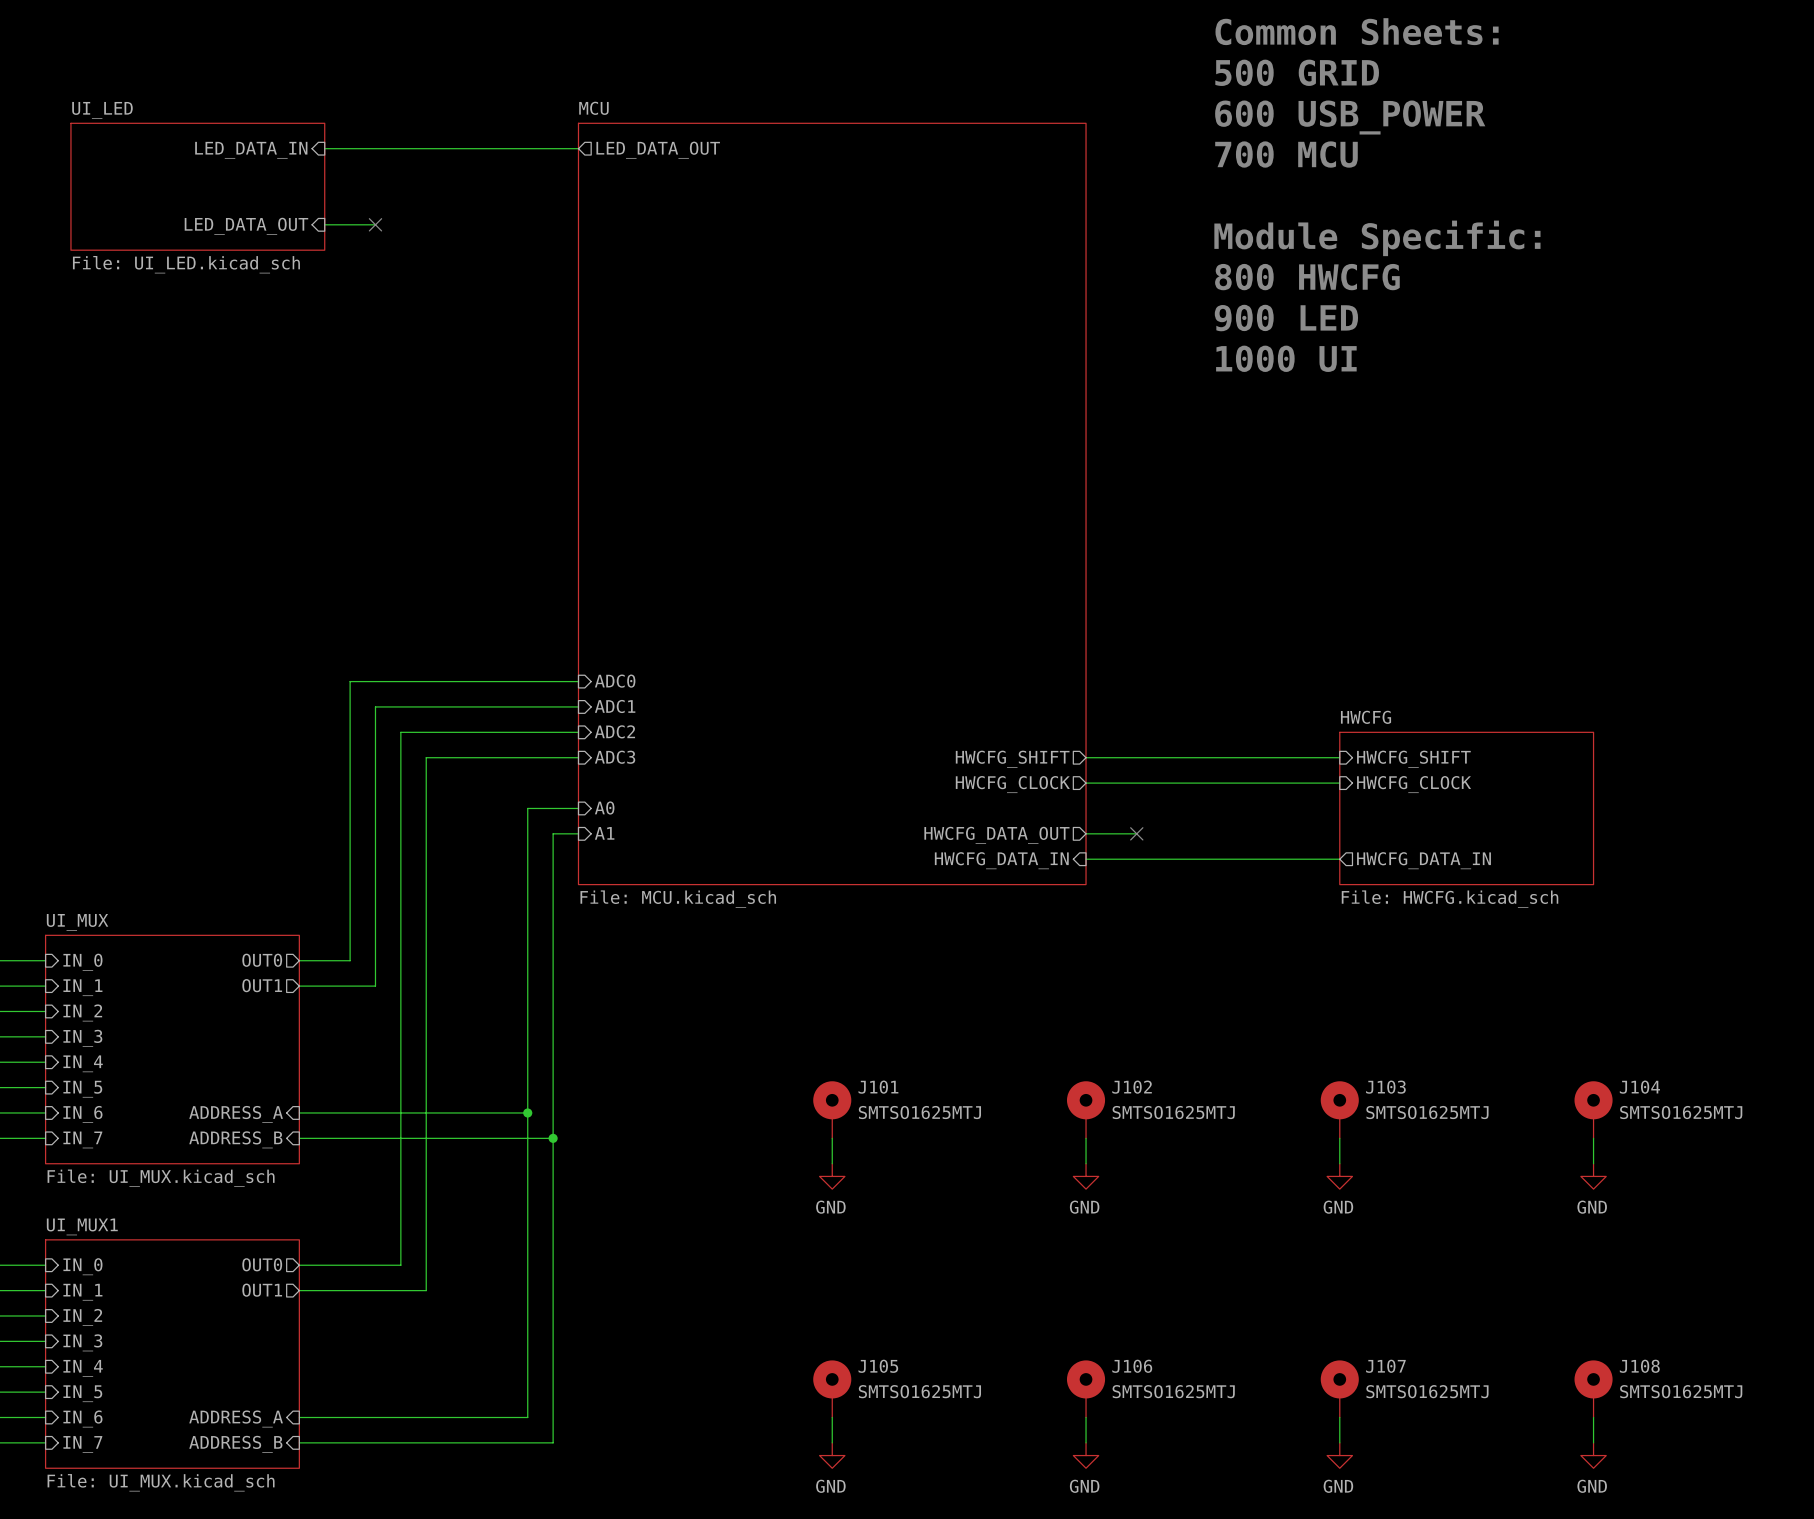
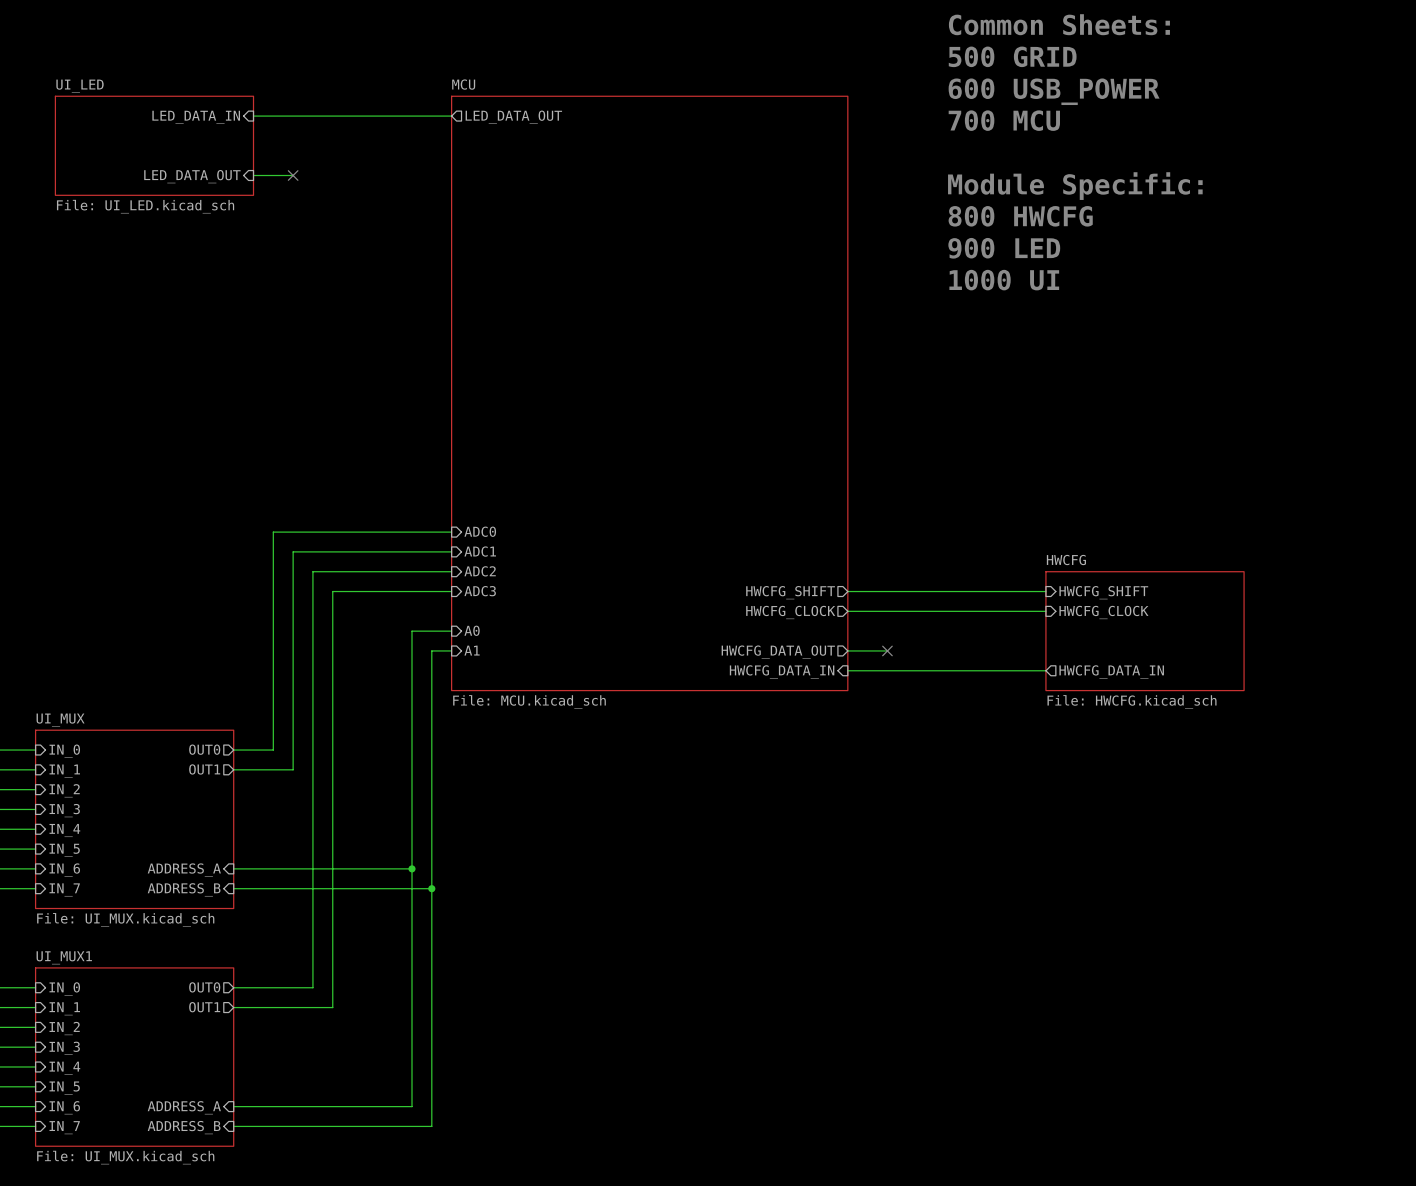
J101: SMTSO1625MTJ (832, 1109) -> none
J102: SMTSO1625MTJ (1086, 1109) -> none
J103: SMTSO1625MTJ (1339, 1109) -> none
J104: SMTSO1625MTJ (1593, 1109) -> none
wire: (832, 1138) (832, 1163) -> none
wire: (1086, 1138) (1086, 1163) -> none
wire: (1339, 1138) (1339, 1163) -> none
wire: (1593, 1138) (1593, 1163) -> none
power symbol: GND (832, 1176) -> none
power symbol: GND (1086, 1176) -> none
power symbol: GND (1339, 1176) -> none
power symbol: GND (1593, 1176) -> none
J105: SMTSO1625MTJ (832, 1388) -> none
J106: SMTSO1625MTJ (1086, 1388) -> none
J107: SMTSO1625MTJ (1339, 1388) -> none
J108: SMTSO1625MTJ (1593, 1388) -> none
wire: (832, 1417) (832, 1442) -> none
wire: (1086, 1417) (1086, 1442) -> none
wire: (1339, 1417) (1339, 1442) -> none
wire: (1593, 1417) (1593, 1442) -> none
power symbol: GND (832, 1455) -> none
power symbol: GND (1086, 1455) -> none
power symbol: GND (1339, 1455) -> none
power symbol: GND (1593, 1455) -> none

